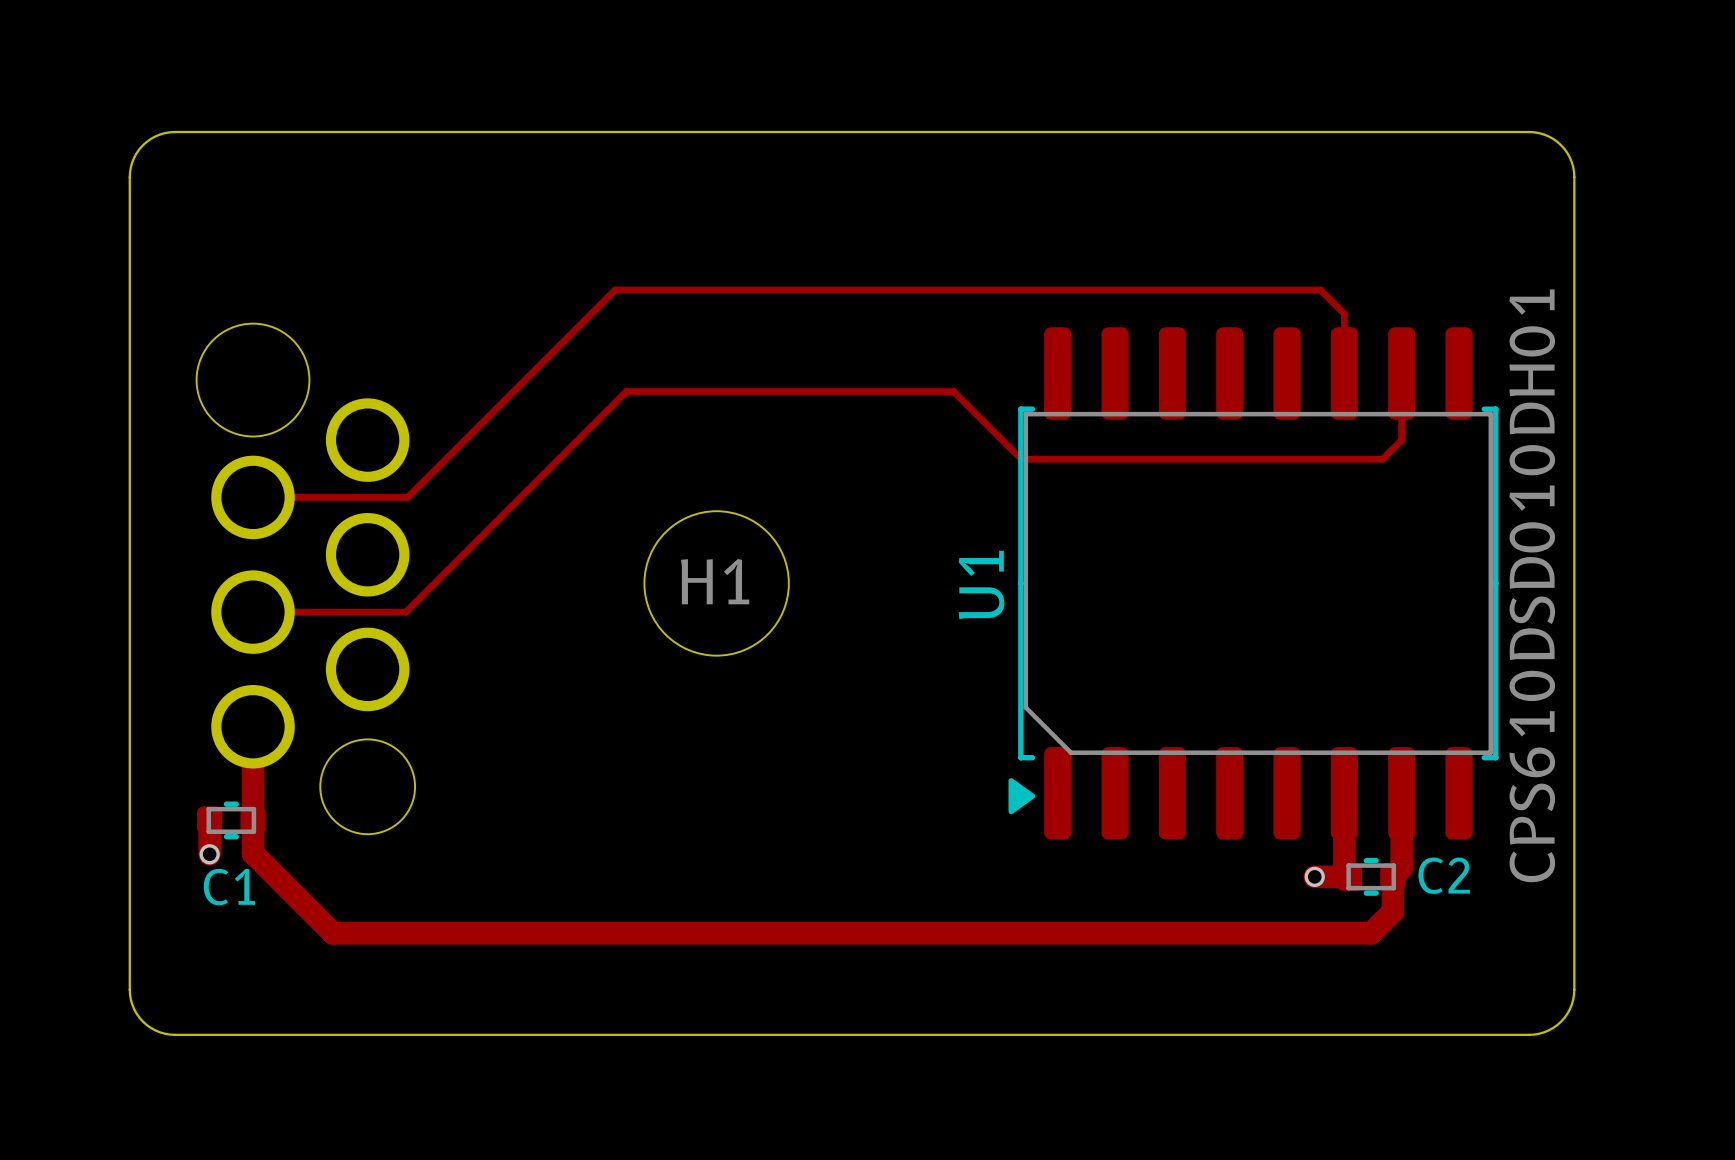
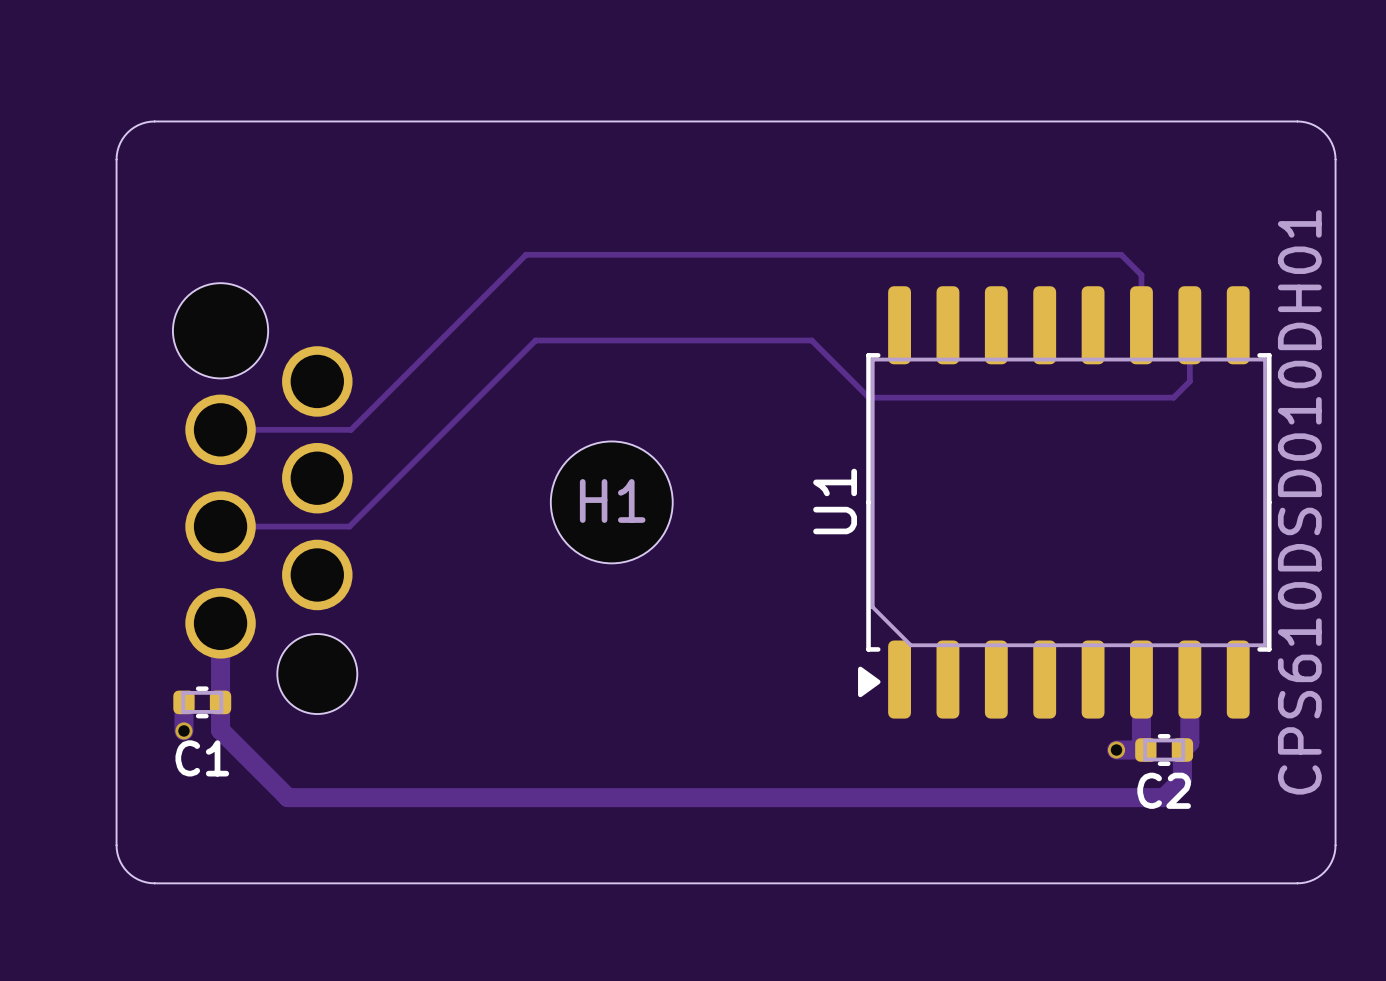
C2 name position: C2 (1444, 875) -> C2 (1164, 790)

